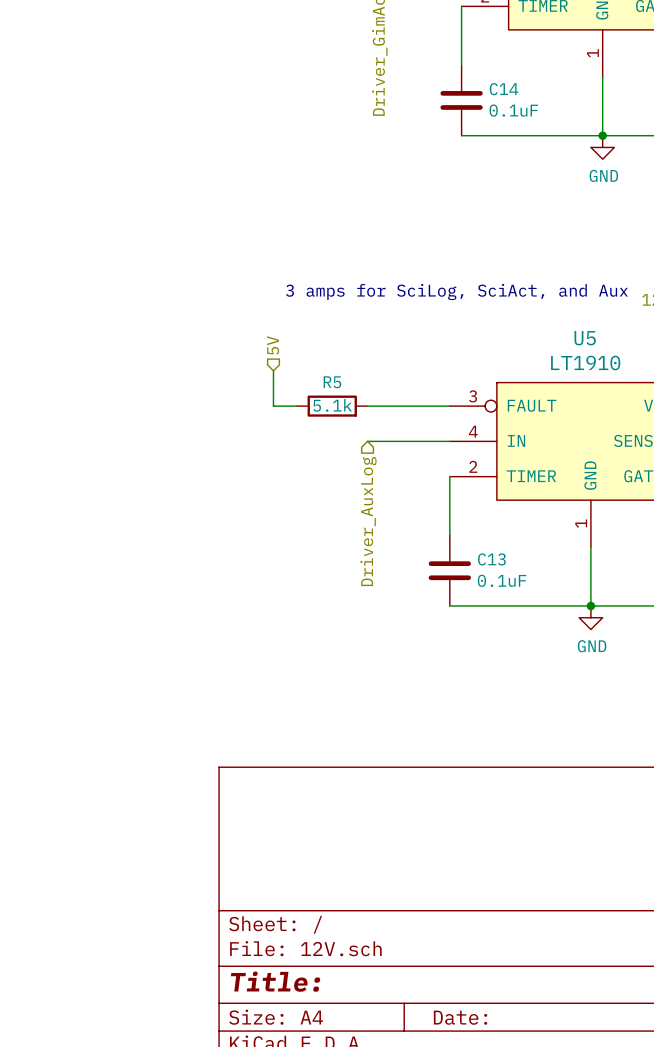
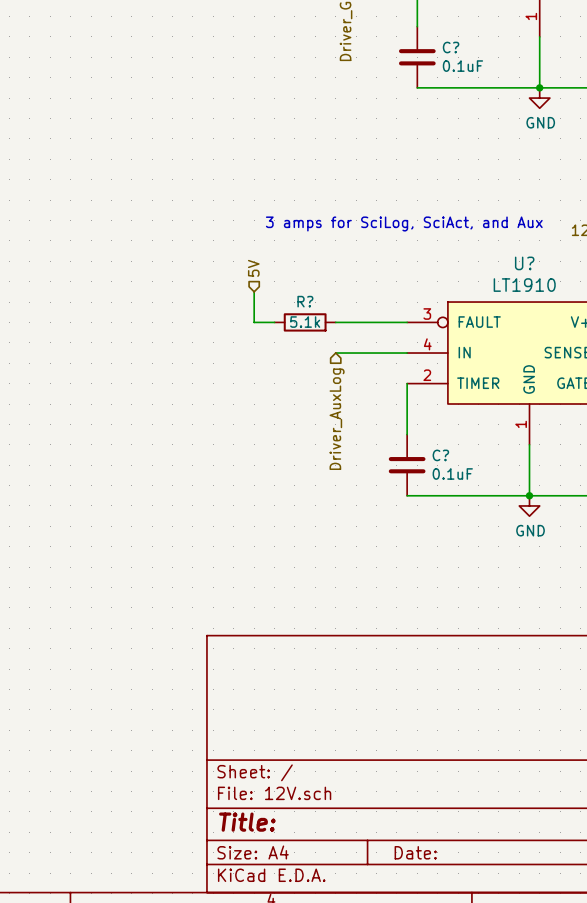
C14 name: C14 (504, 89) -> C? (451, 47)
U5 name: U5 (585, 338) -> U? (524, 263)
R5 name: R5 (332, 382) -> R? (305, 301)
C13 name: C13 (491, 559) -> C? (440, 455)

